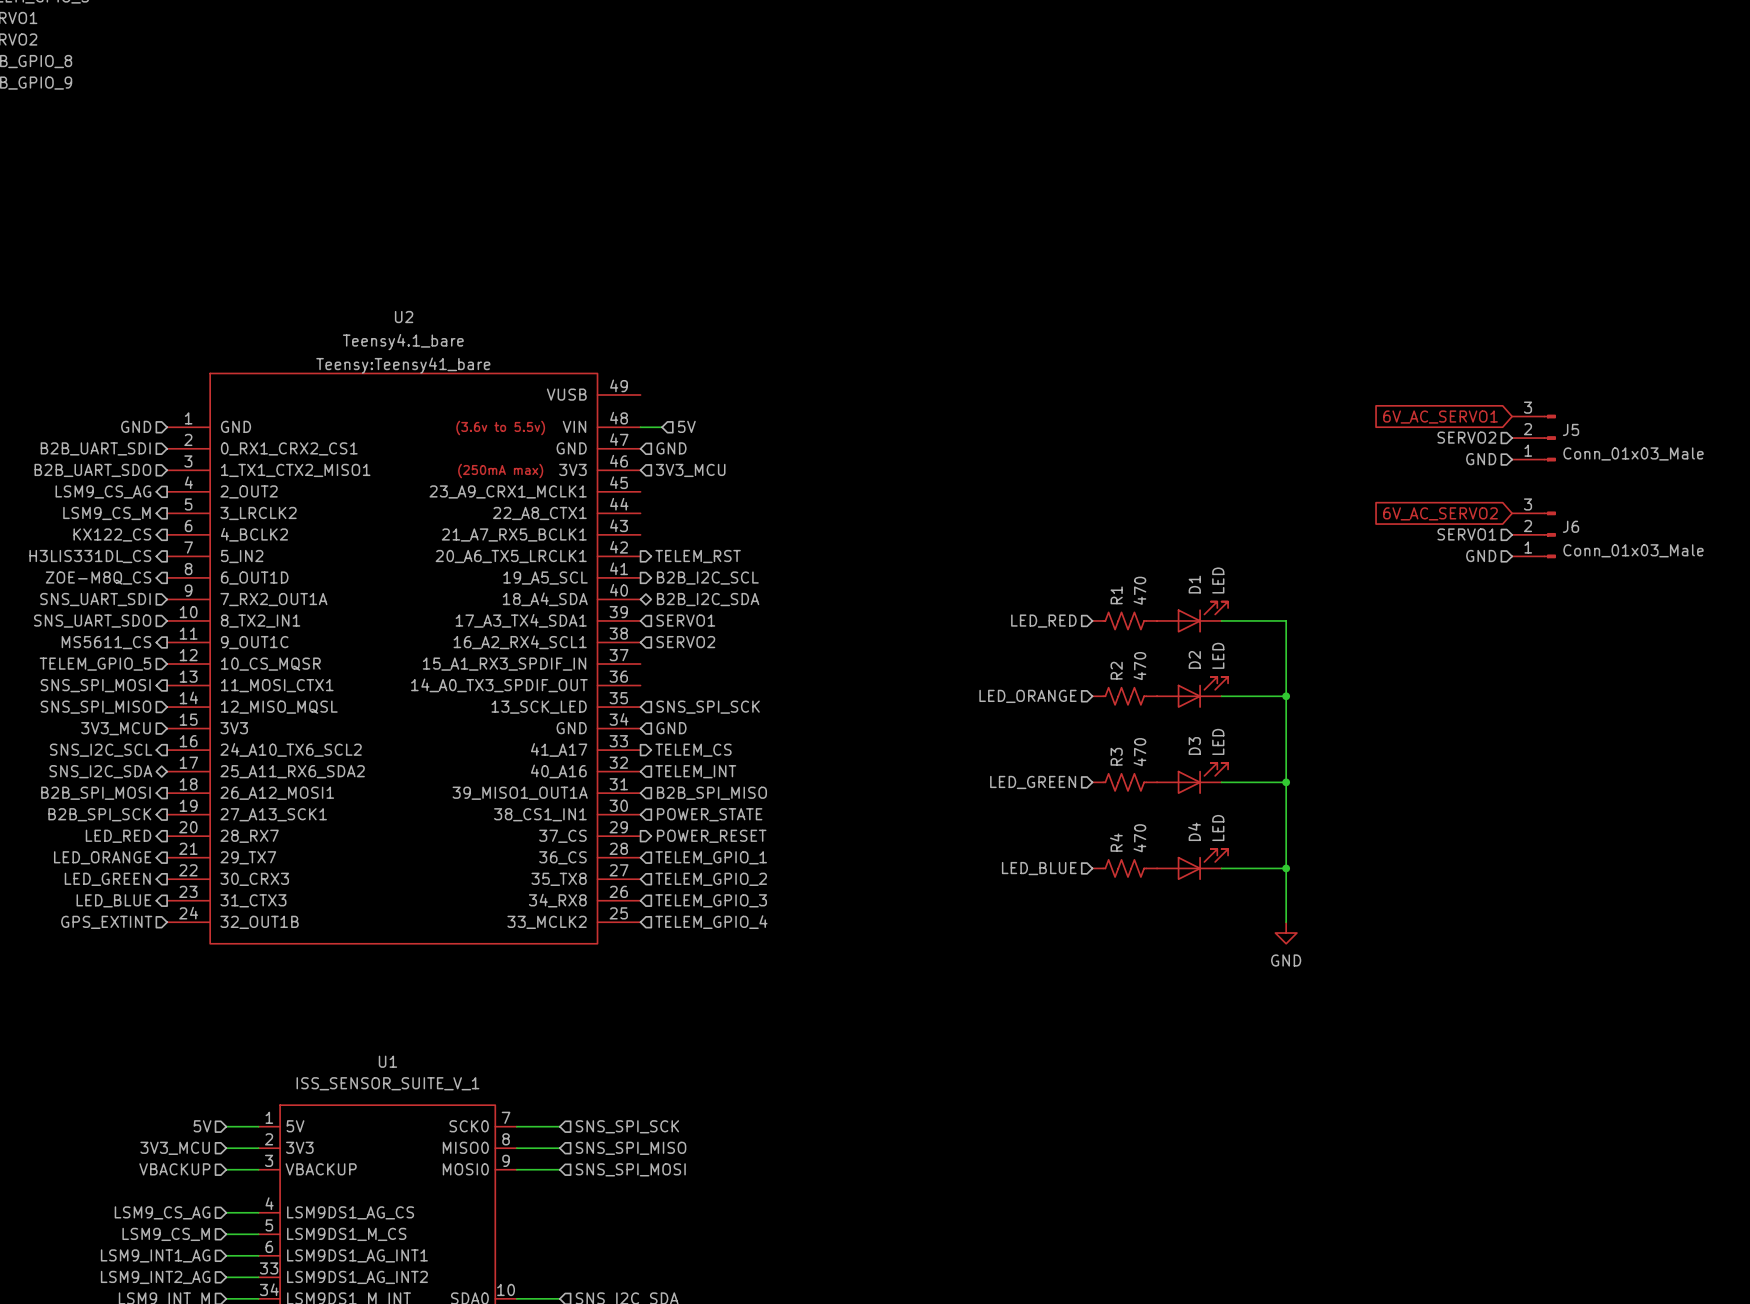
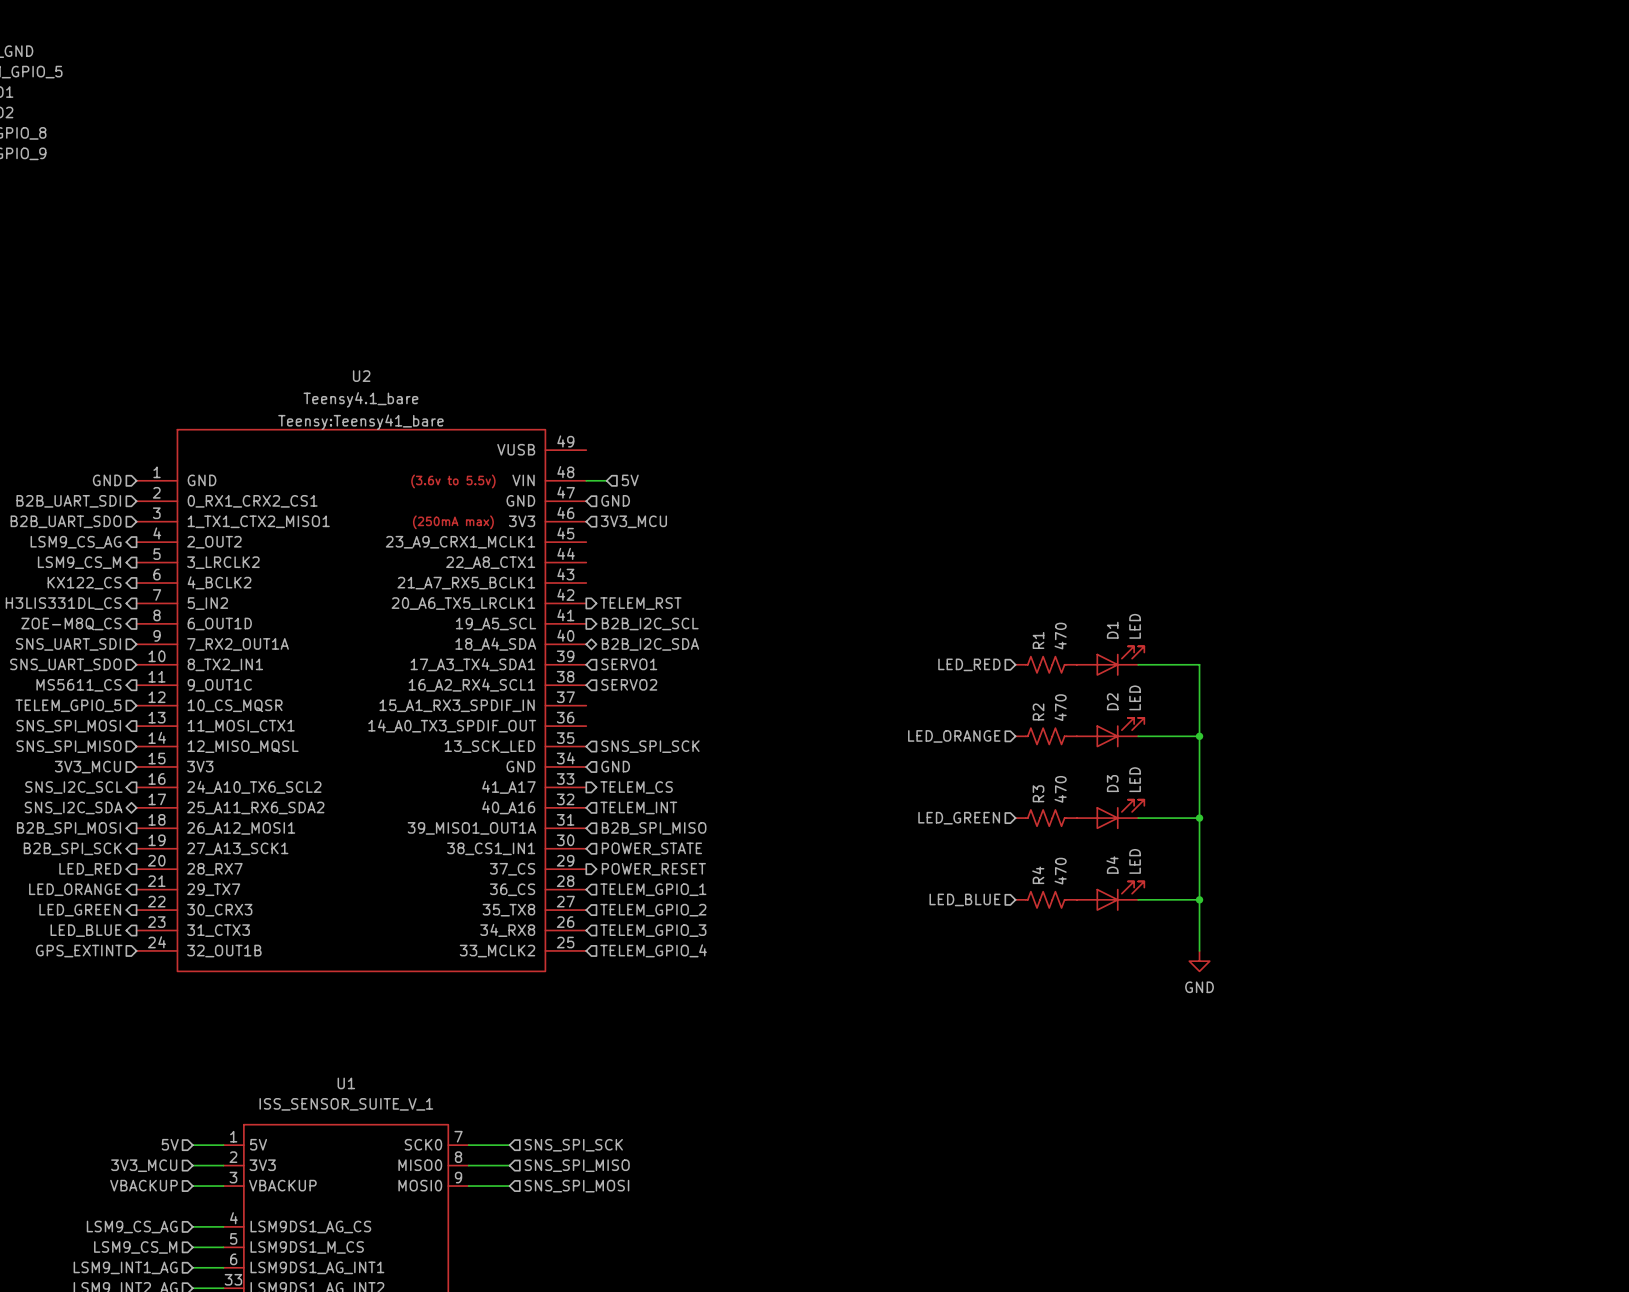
global label: 6V_AC_SERVO1 (1440, 417) -> none
hierarchical label: SERVO2 (1466, 437) -> none
J5: Conn_01x03_Male (1533, 438) -> none
hierarchical label: GND (1481, 459) -> none
global label: 6V_AC_SERVO2 (1440, 513) -> none
hierarchical label: SERVO1 (1466, 534) -> none
J6: Conn_01x03_Male (1533, 534) -> none
hierarchical label: GND (1481, 556) -> none

